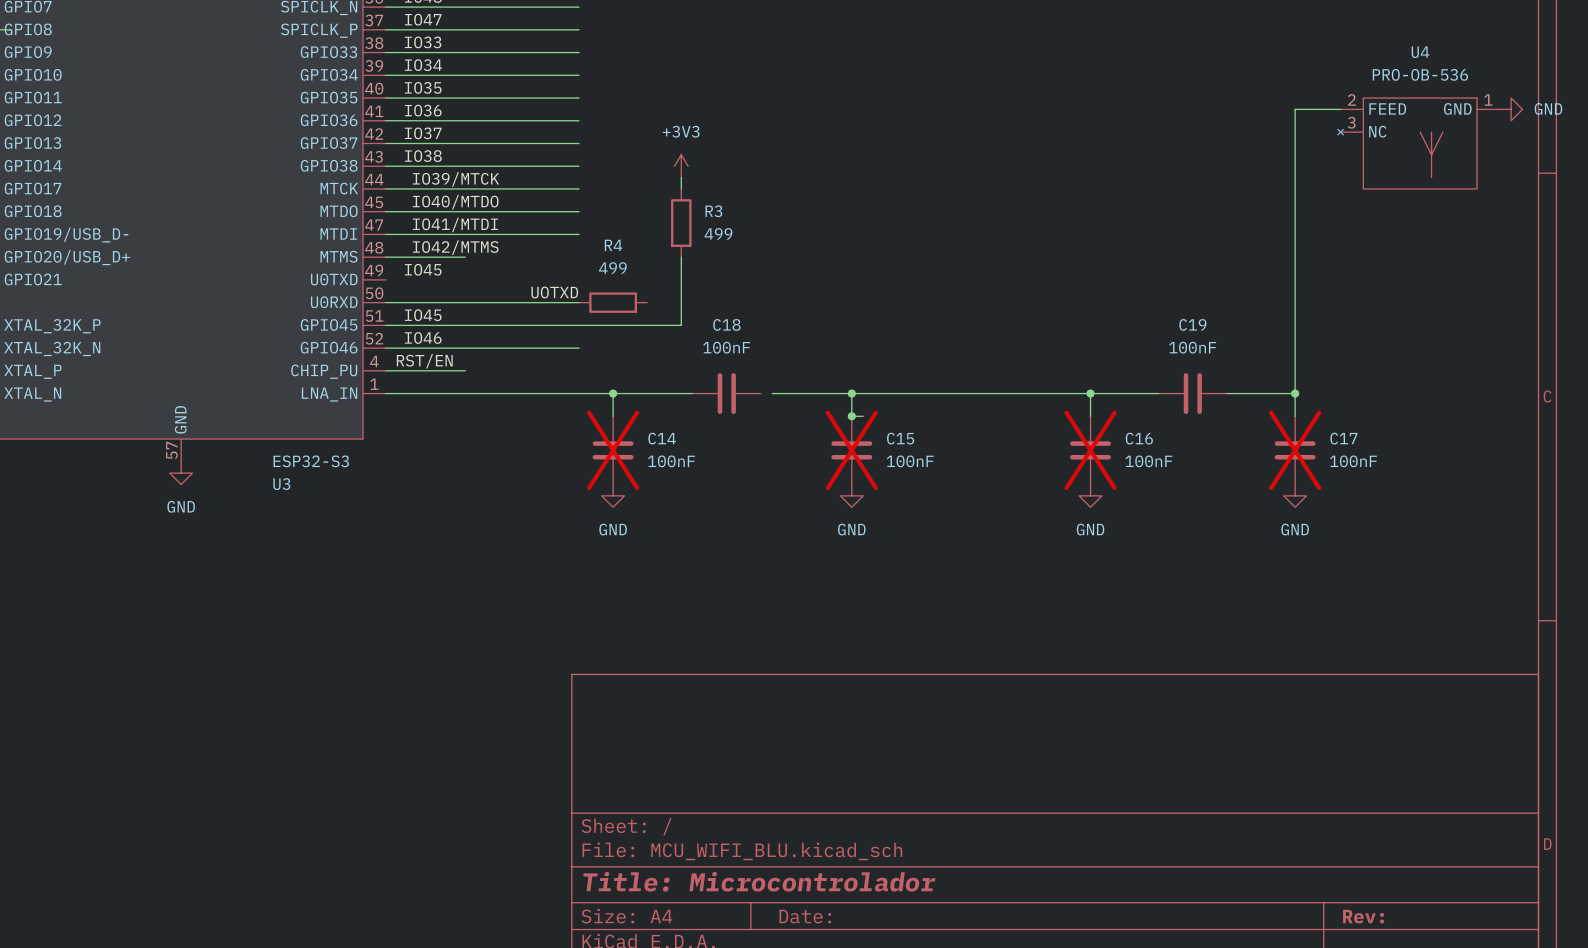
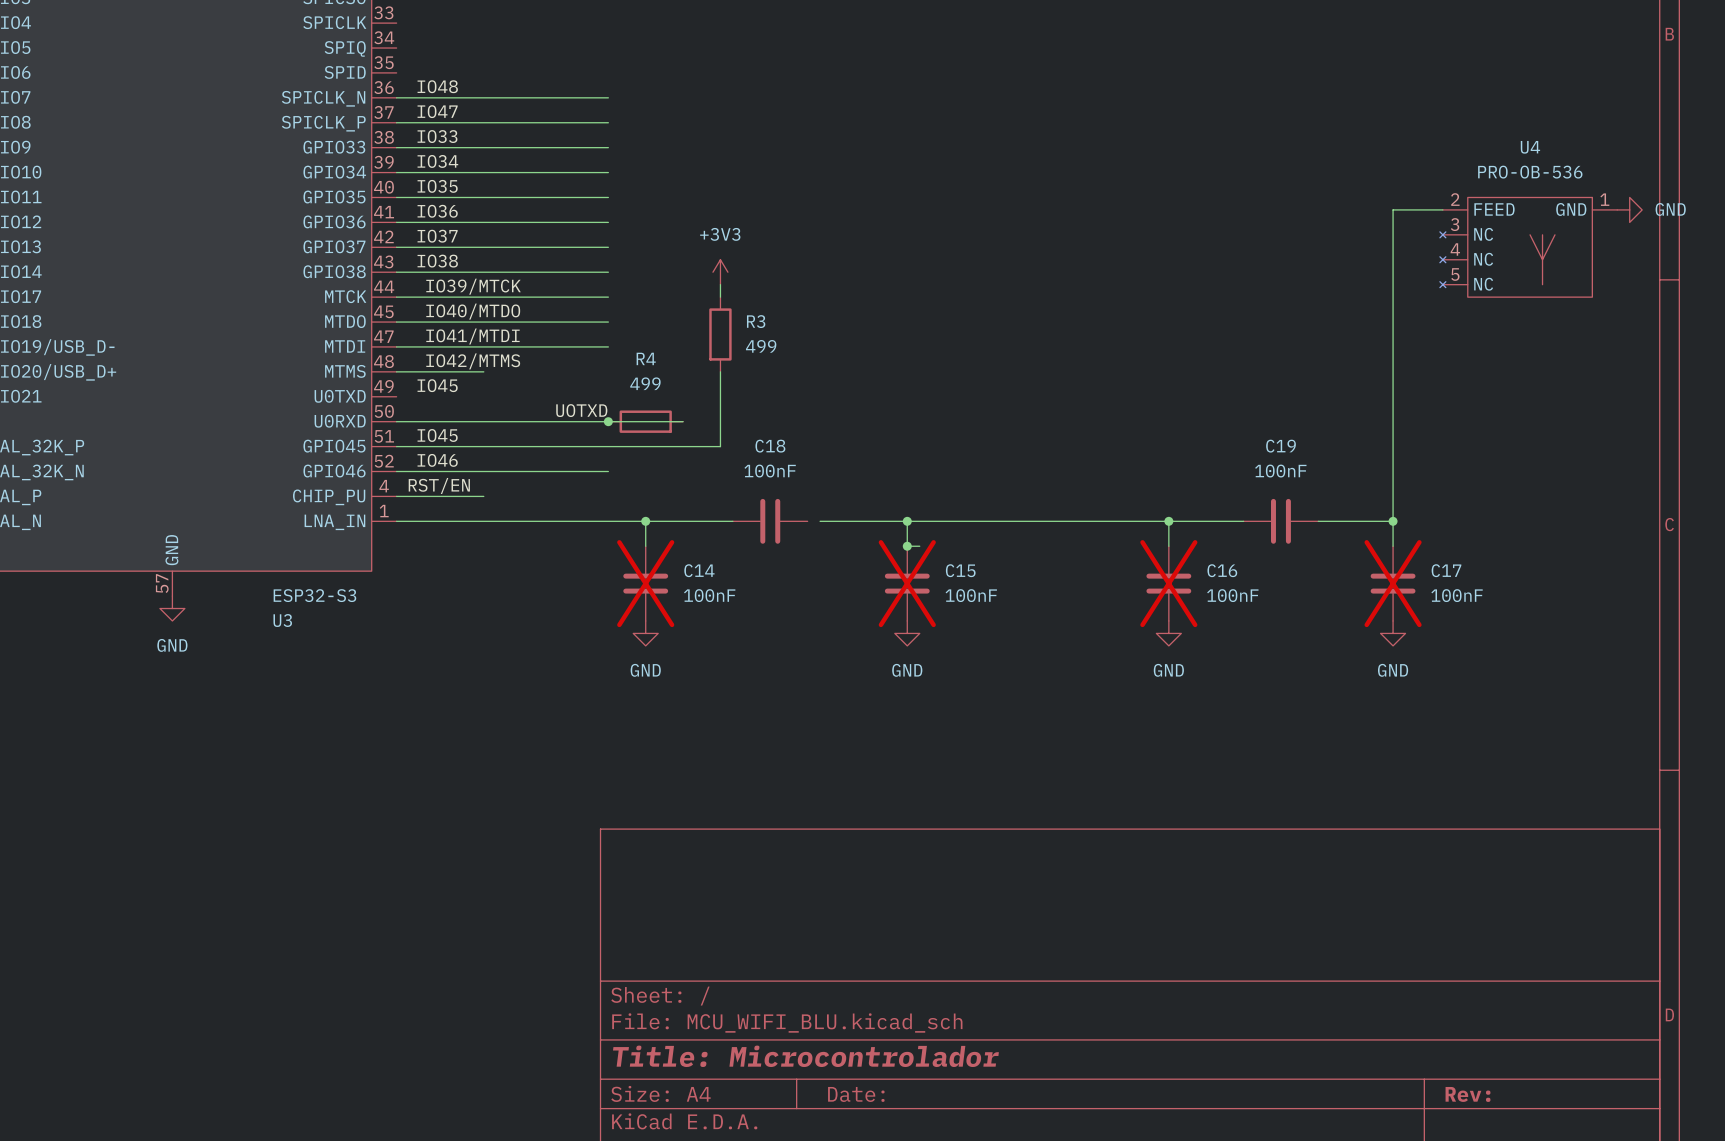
U4 symbol: [1337, 98, 1500, 189] -> [1439, 197, 1618, 298]
wire: none -> (608, 421) (683, 421)
junction: none -> (608, 421)

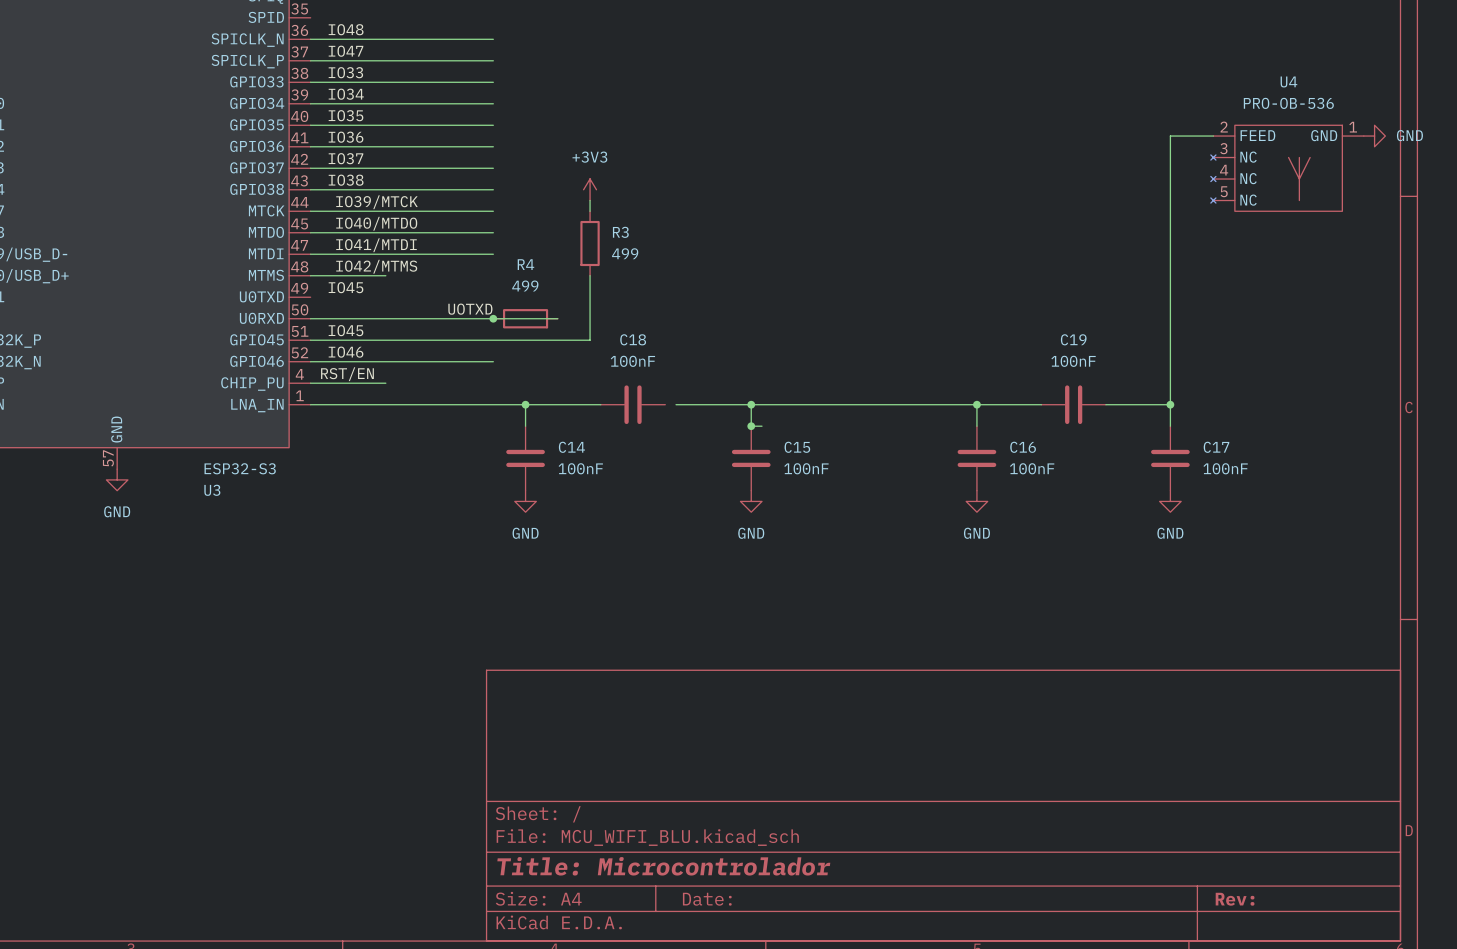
C14 do-not-place cross: (645, 583) -> none
C15 do-not-place cross: (907, 583) -> none
C16 do-not-place cross: (1168, 583) -> none
C17 do-not-place cross: (1393, 583) -> none

